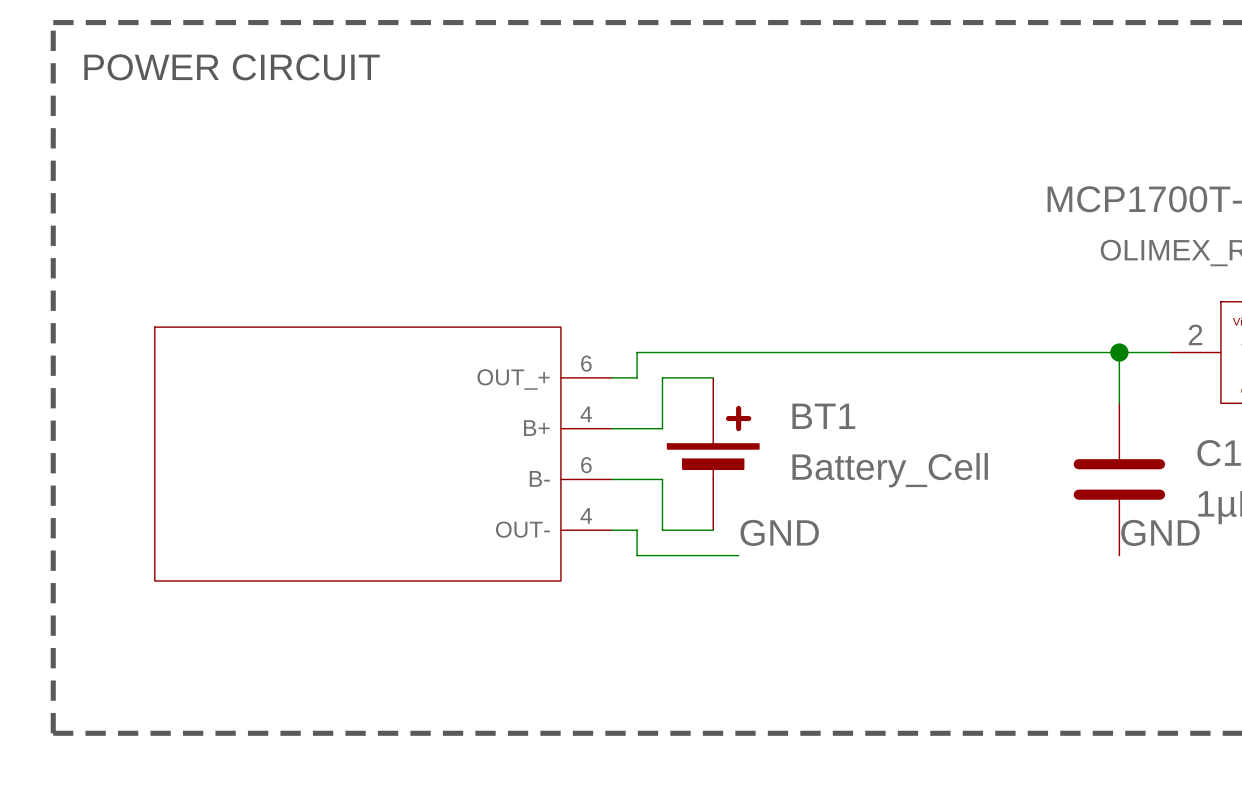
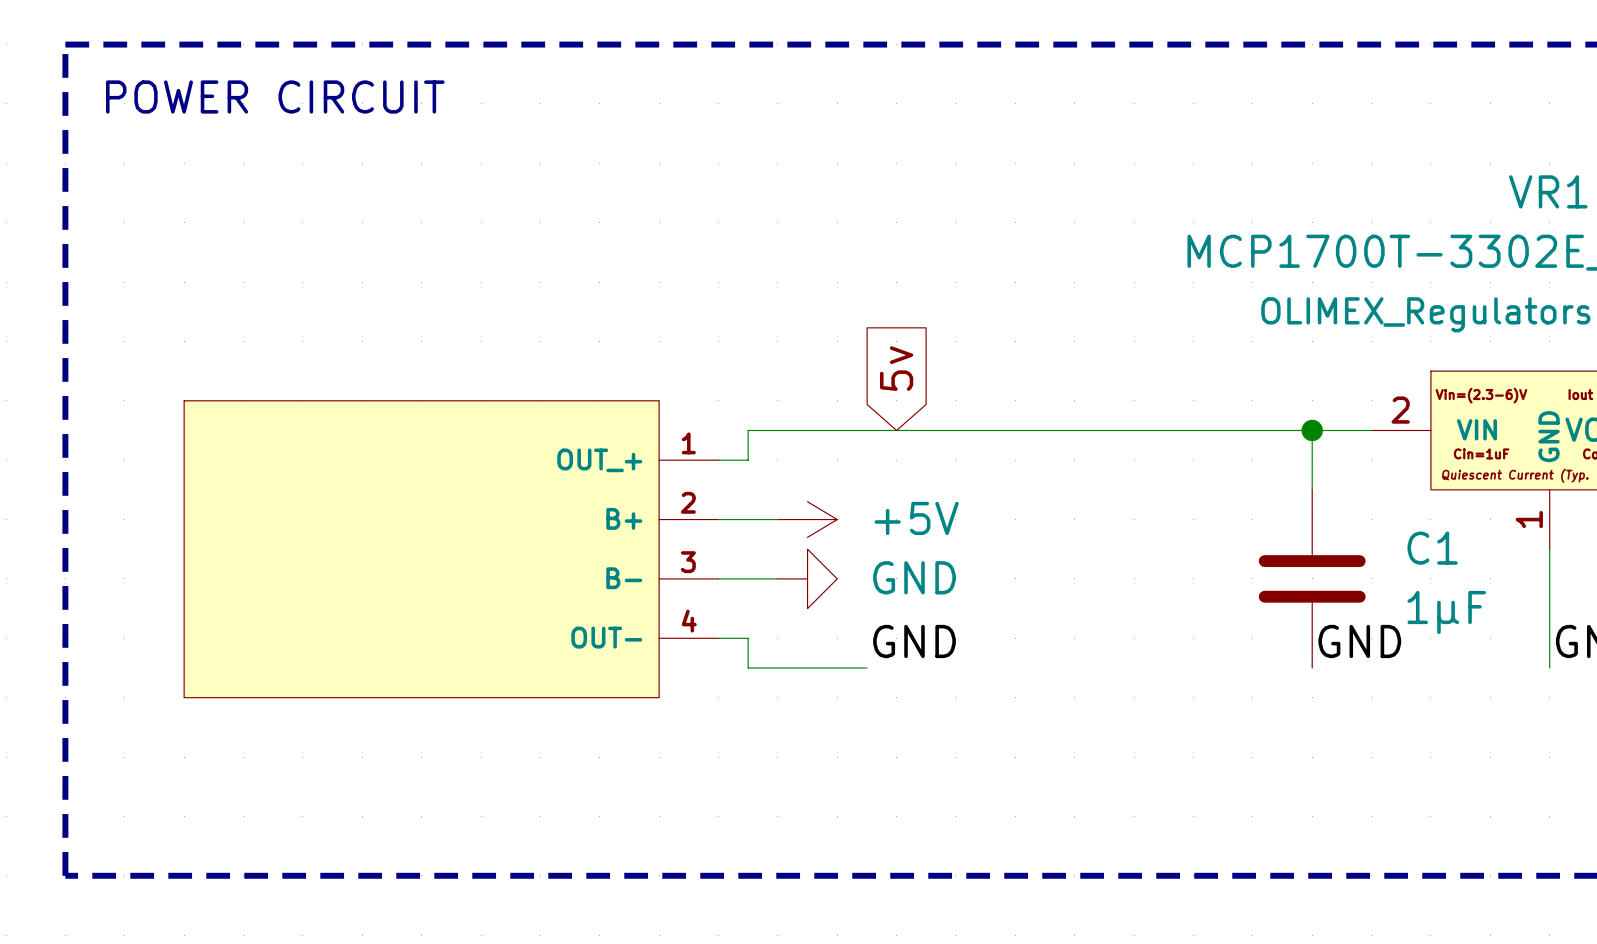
global label: none -> 5v (896, 368)
part pin number: 6 (586, 363) -> 1 (688, 443)
wire: (713, 377) (662, 377) (662, 428) -> none
part pin number: 4 (586, 414) -> 2 (688, 502)
power symbol: none -> +5V (807, 519)
BT1: Battery_Cell (713, 454) -> none
part pin number: 6 (586, 465) -> 3 (688, 562)
wire: (662, 479) (662, 530) (713, 530) -> none
power symbol: none -> GND (807, 578)

